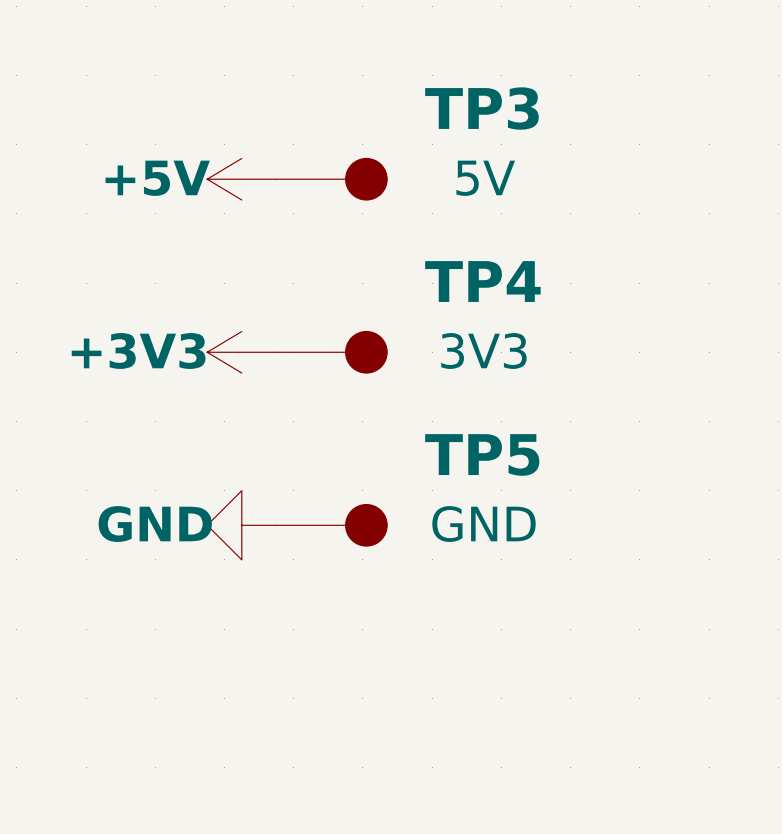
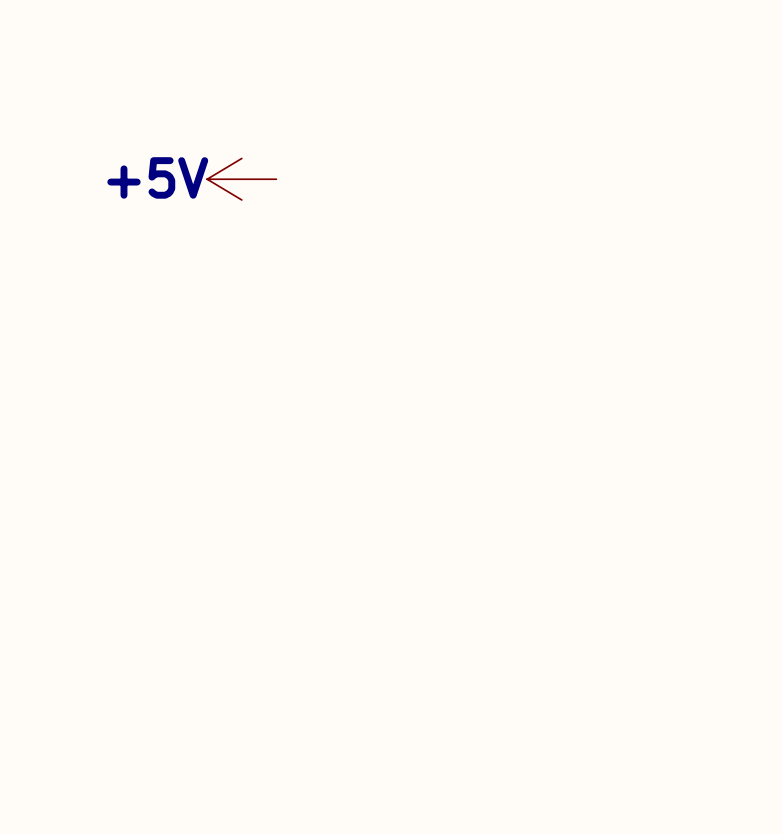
TP3: 5V (331, 179) -> none
power symbol: +3V3 (241, 352) -> none
TP4: 3V3 (331, 352) -> none
power symbol: GND (241, 525) -> none
TP5: GND (331, 525) -> none

